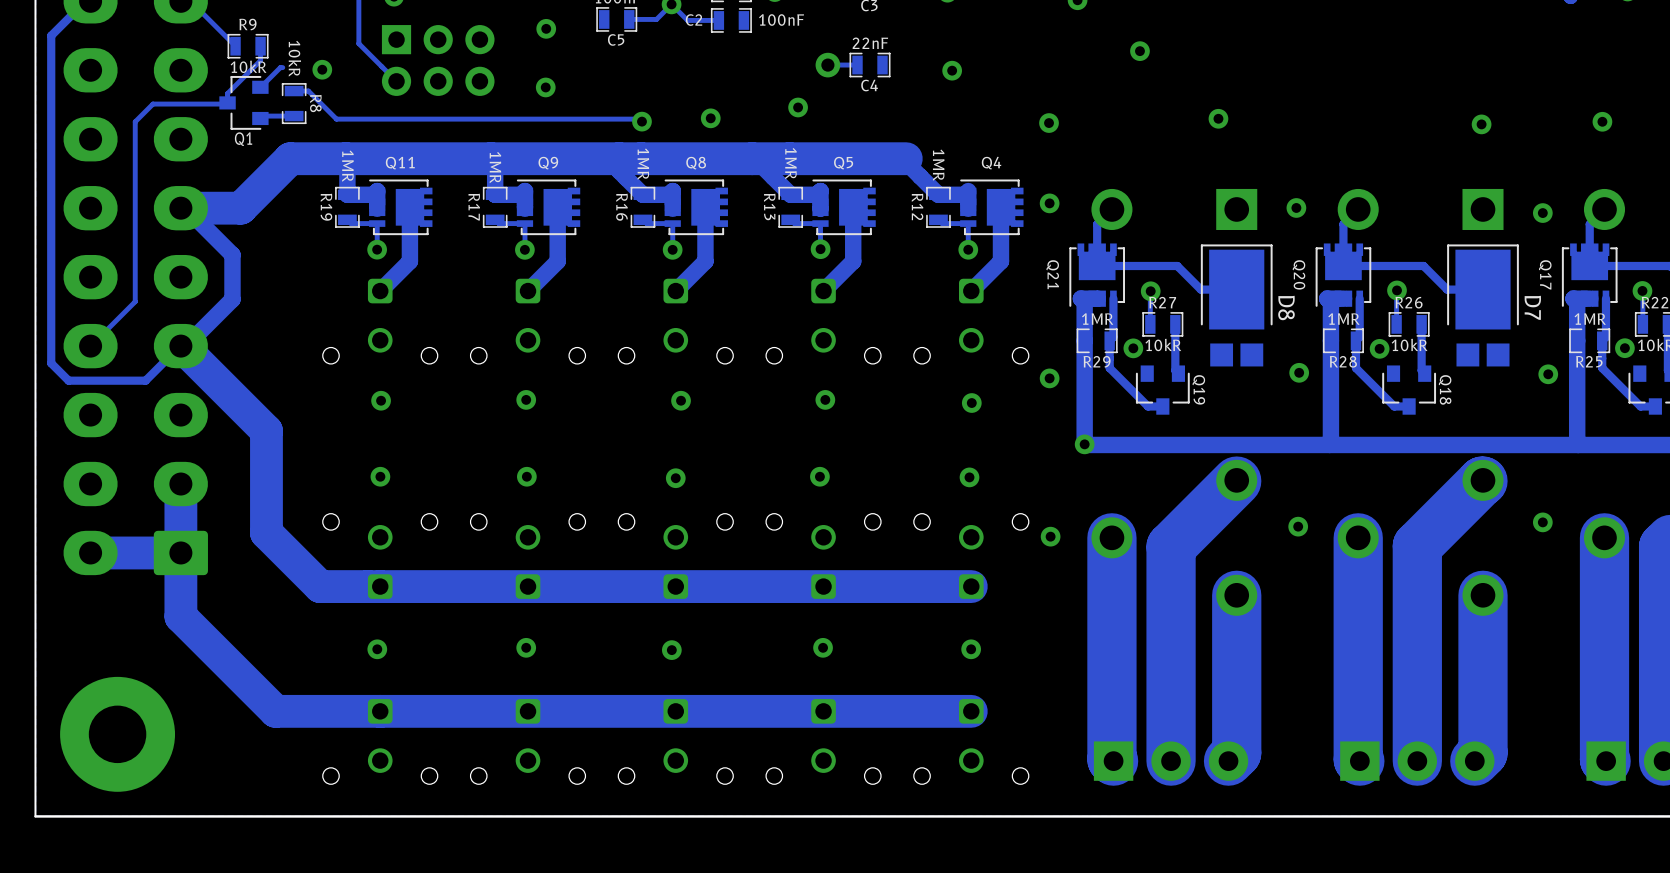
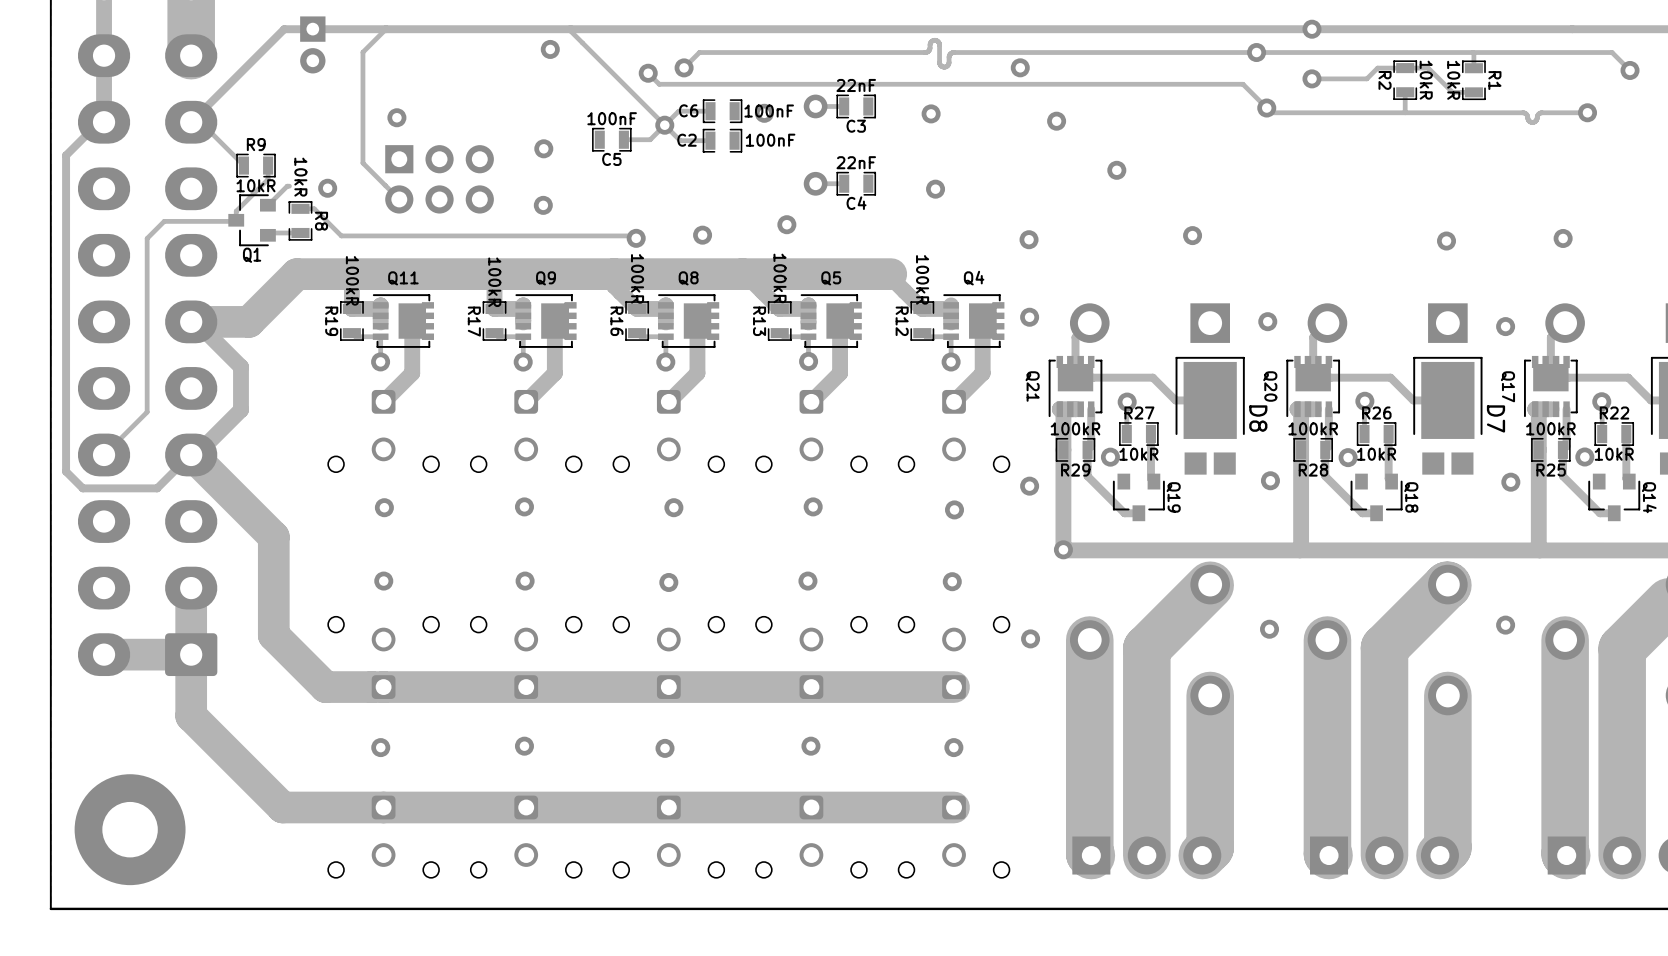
R13 value: 1MR (790, 163) -> 100kR (780, 278)
R16 value: 1MR (643, 164) -> 100kR (637, 278)
R12 value: 1MR (938, 165) -> 100kR (922, 279)
R19 value: 1MR (347, 166) -> 100kR (352, 280)
R17 value: 1MR (495, 167) -> 100kR (494, 282)
R29 value: 1MR (1097, 319) -> 100kR (1075, 428)
R28 value: 1MR (1343, 319) -> 100kR (1313, 428)
R25 value: 1MR (1590, 319) -> 100kR (1550, 428)

